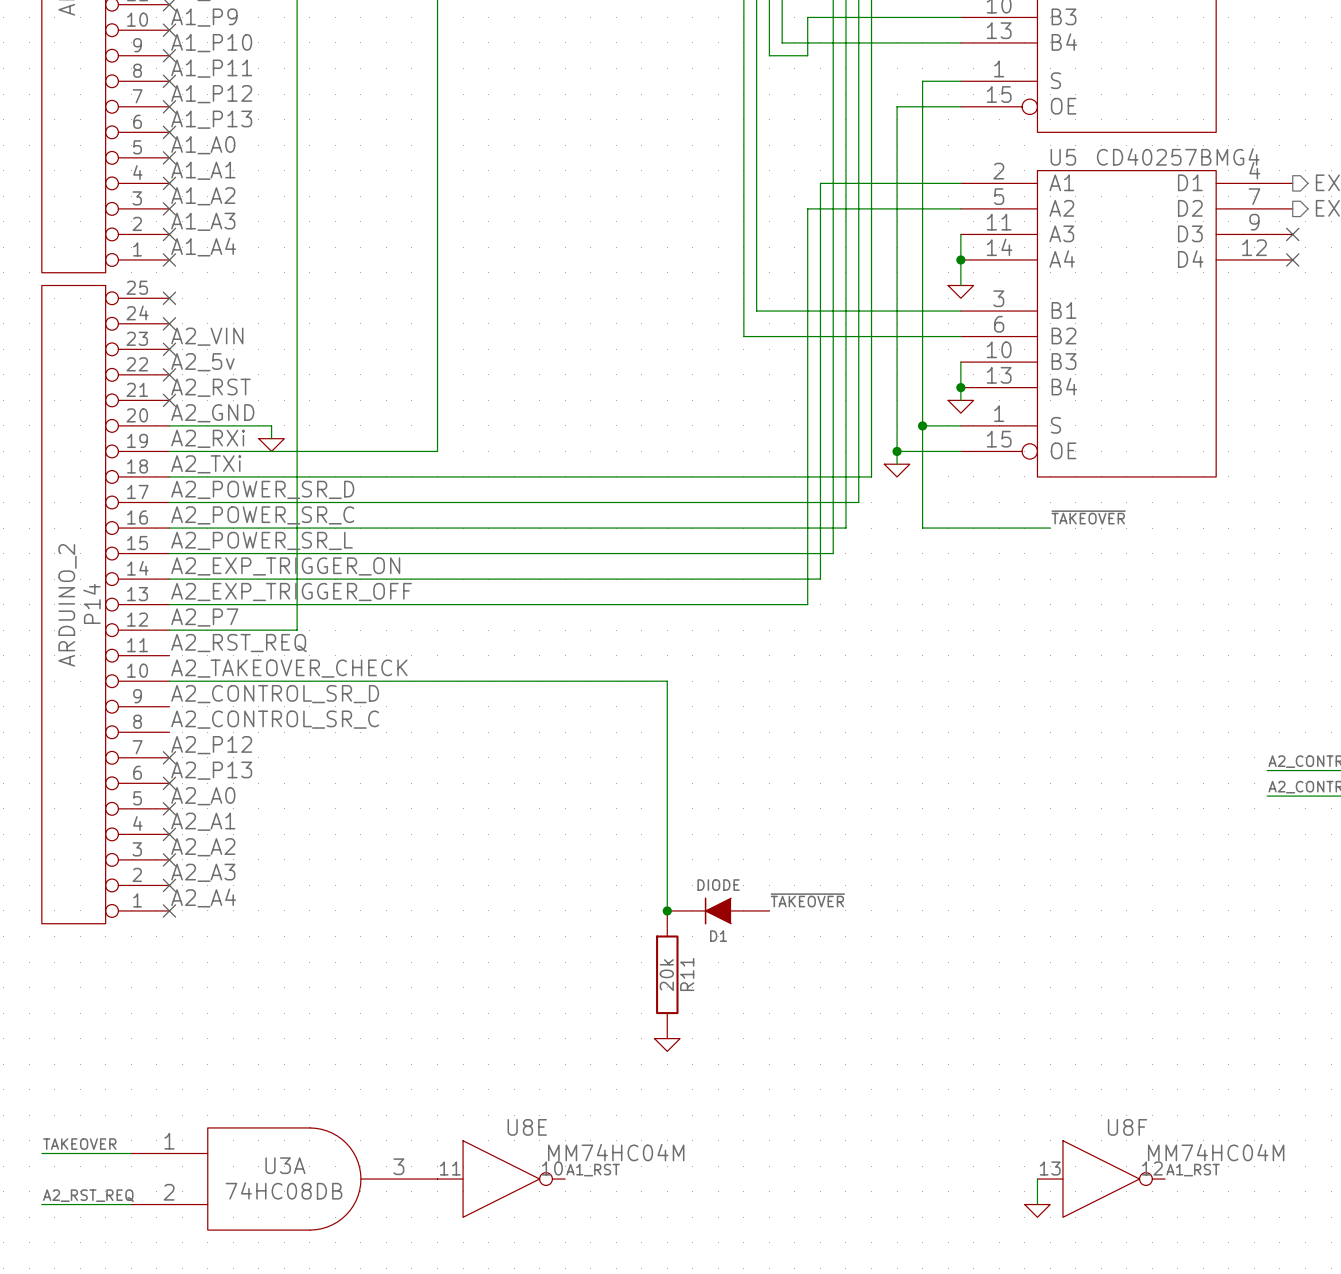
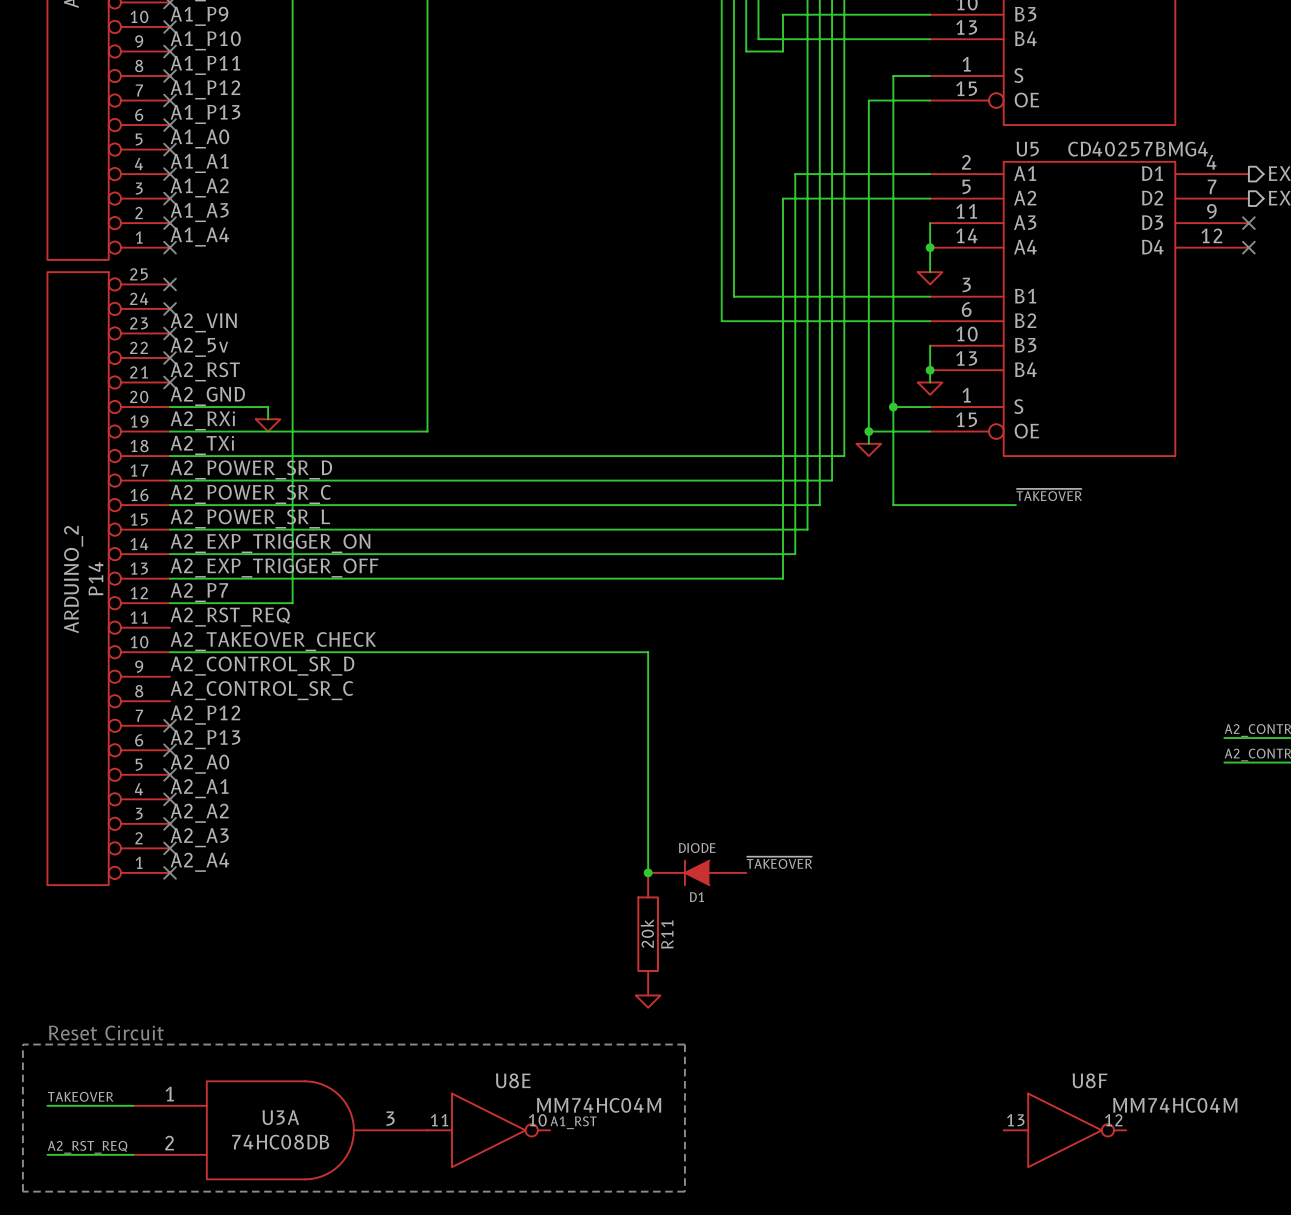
text: none -> Reset Circuit (106, 1033)
line: none -> (22, 1044) (684, 1044) (684, 1191) (22, 1191) (22, 1044)
label: A1_RST (1193, 1170) -> none
wire: (1037, 1179) (1037, 1204) -> none
power symbol: (1037, 1210) -> none

